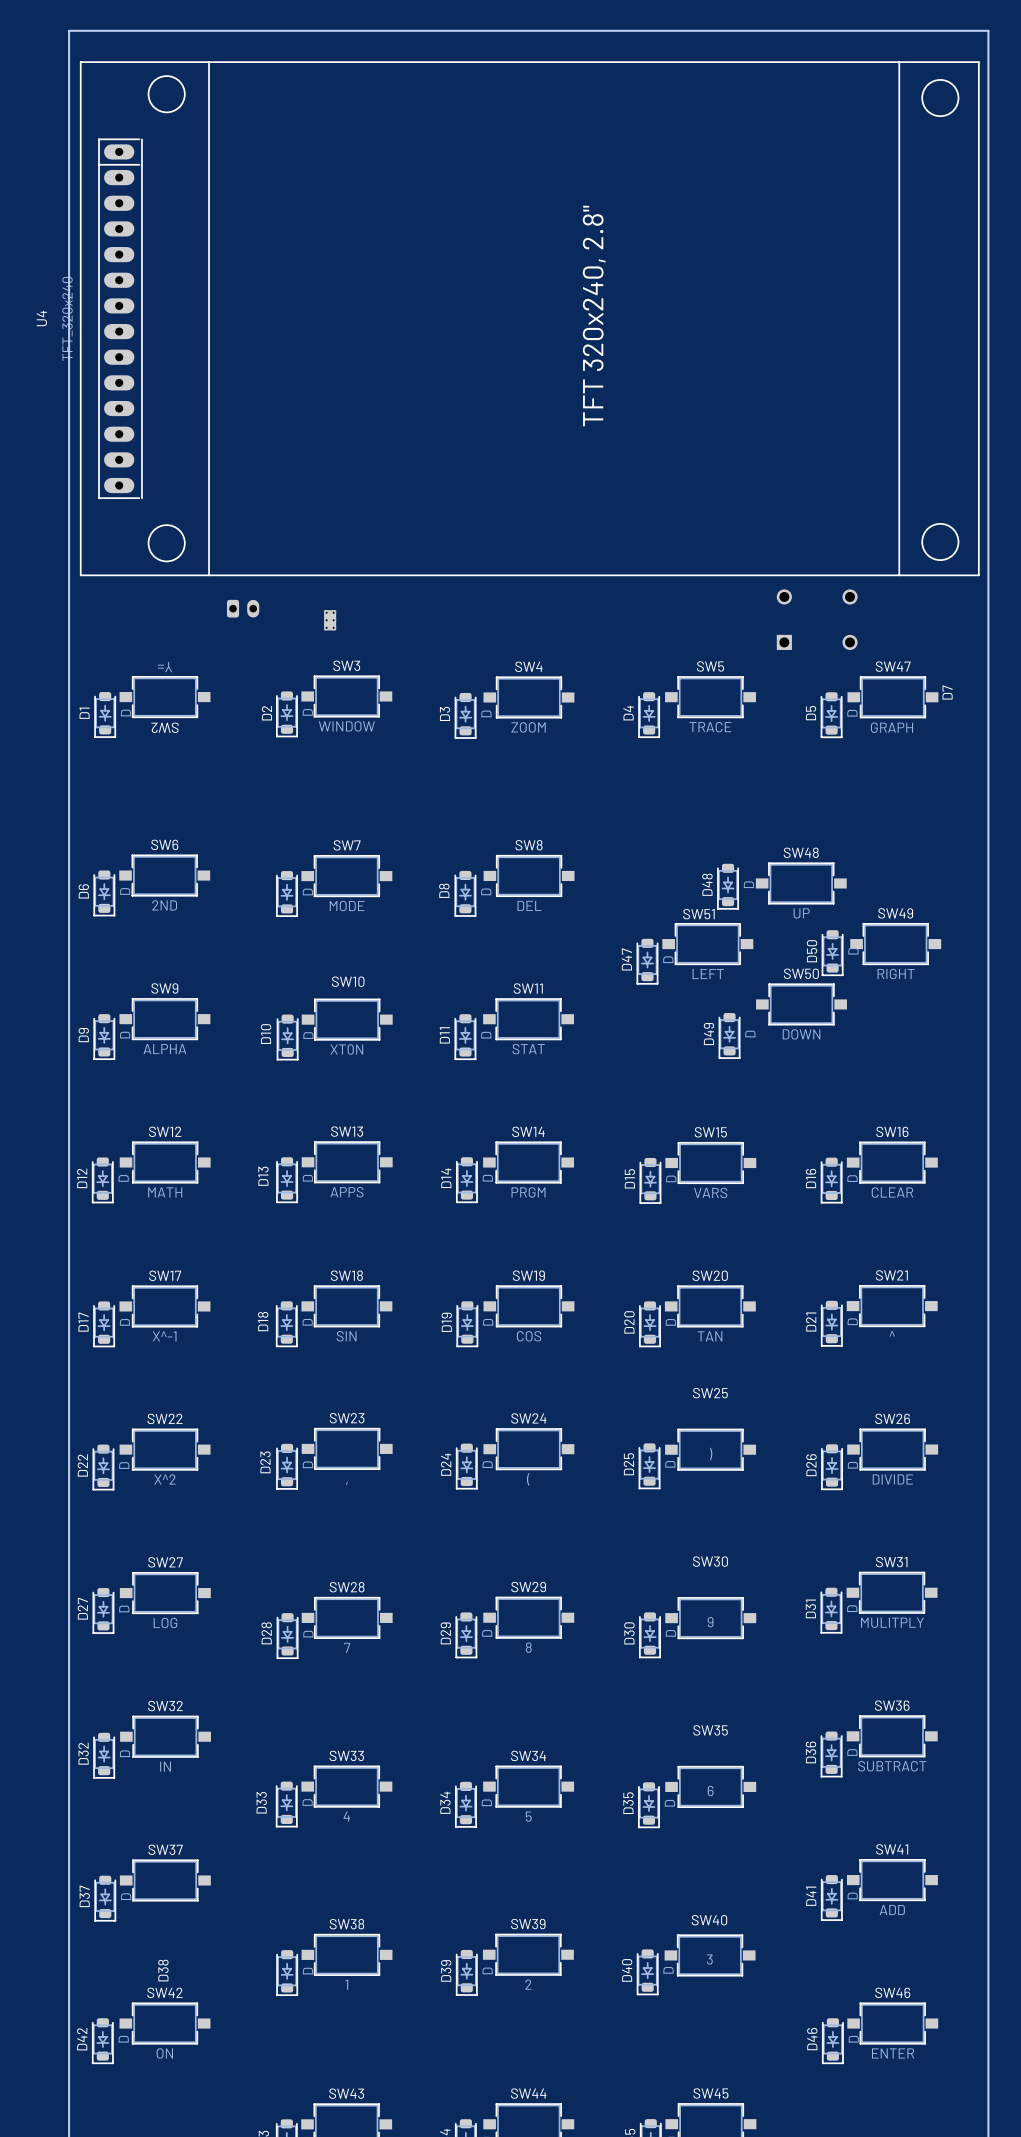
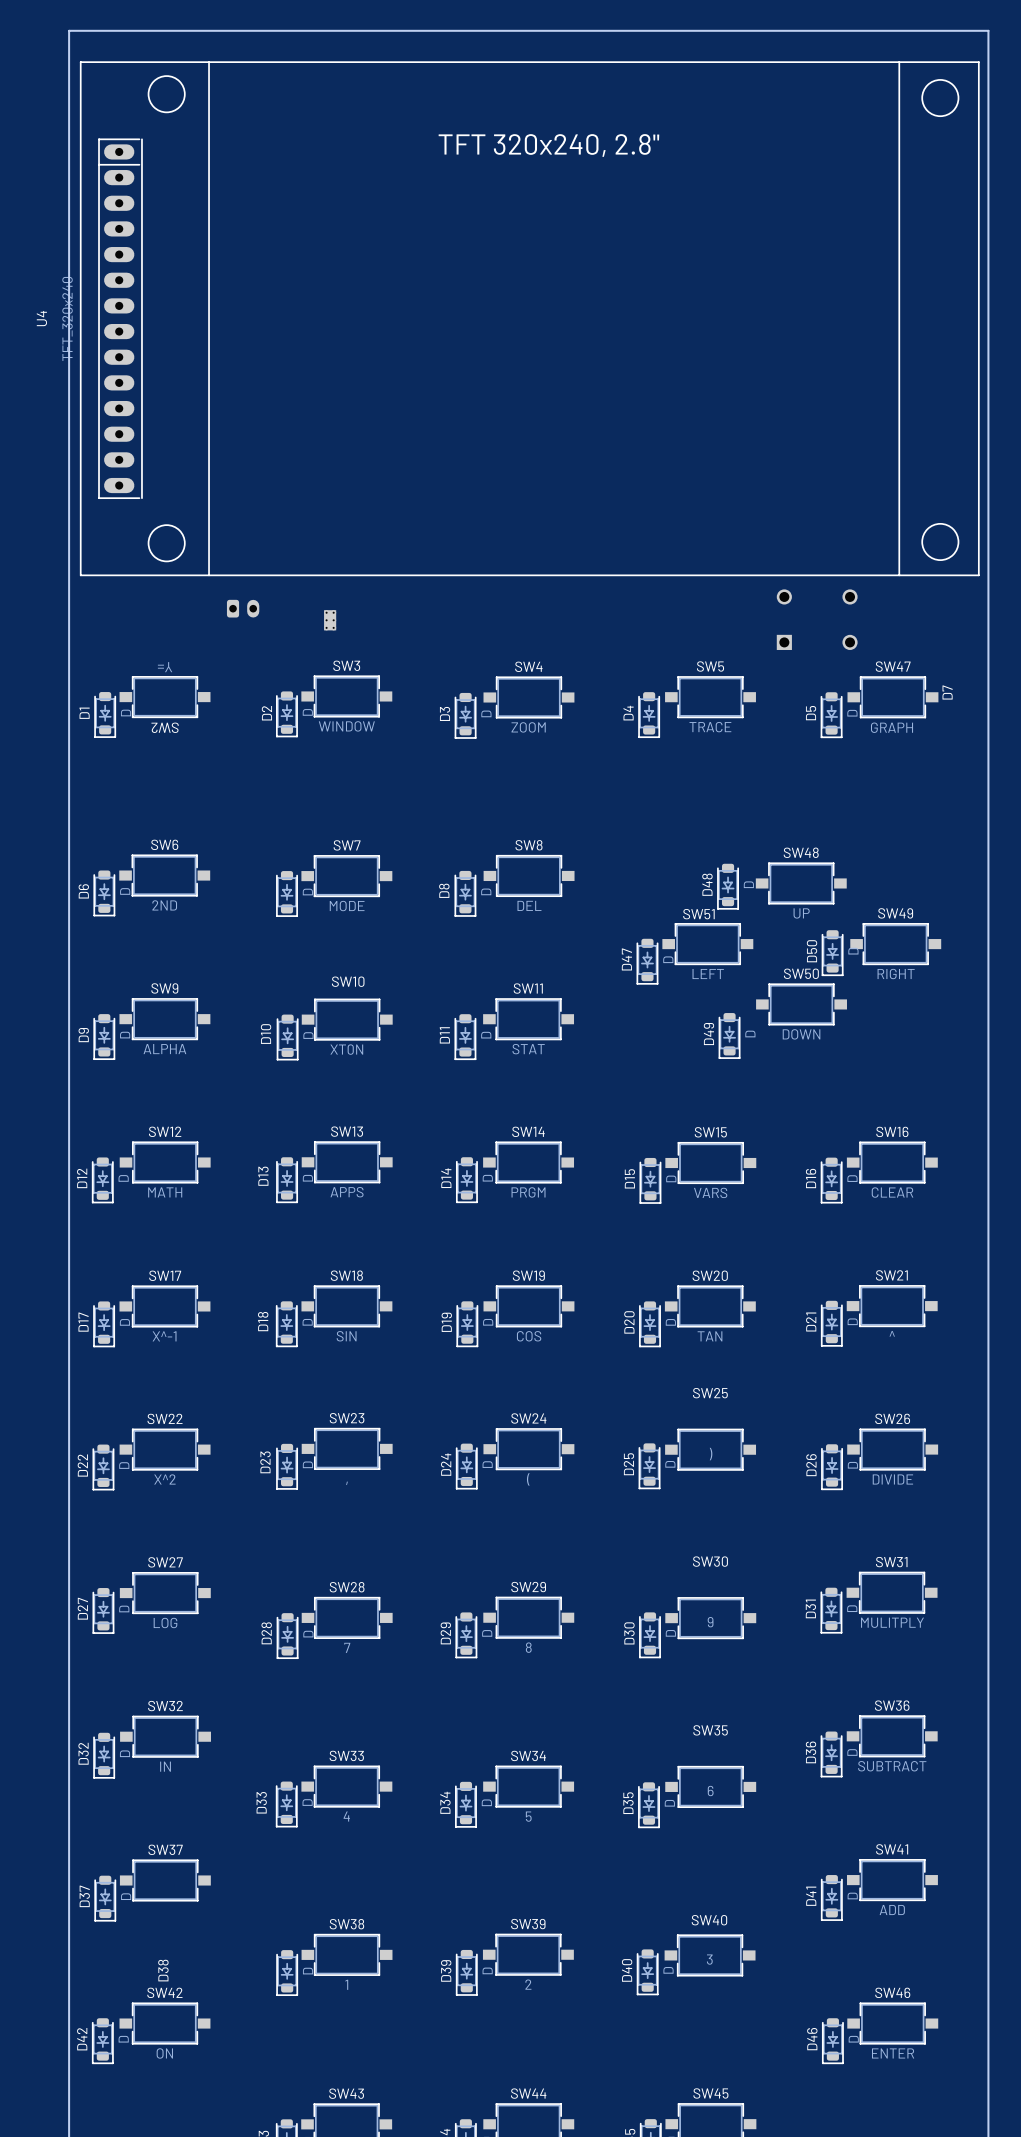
U4 text rotation: 0° (594, 315) -> 90° clockwise (548, 145)

